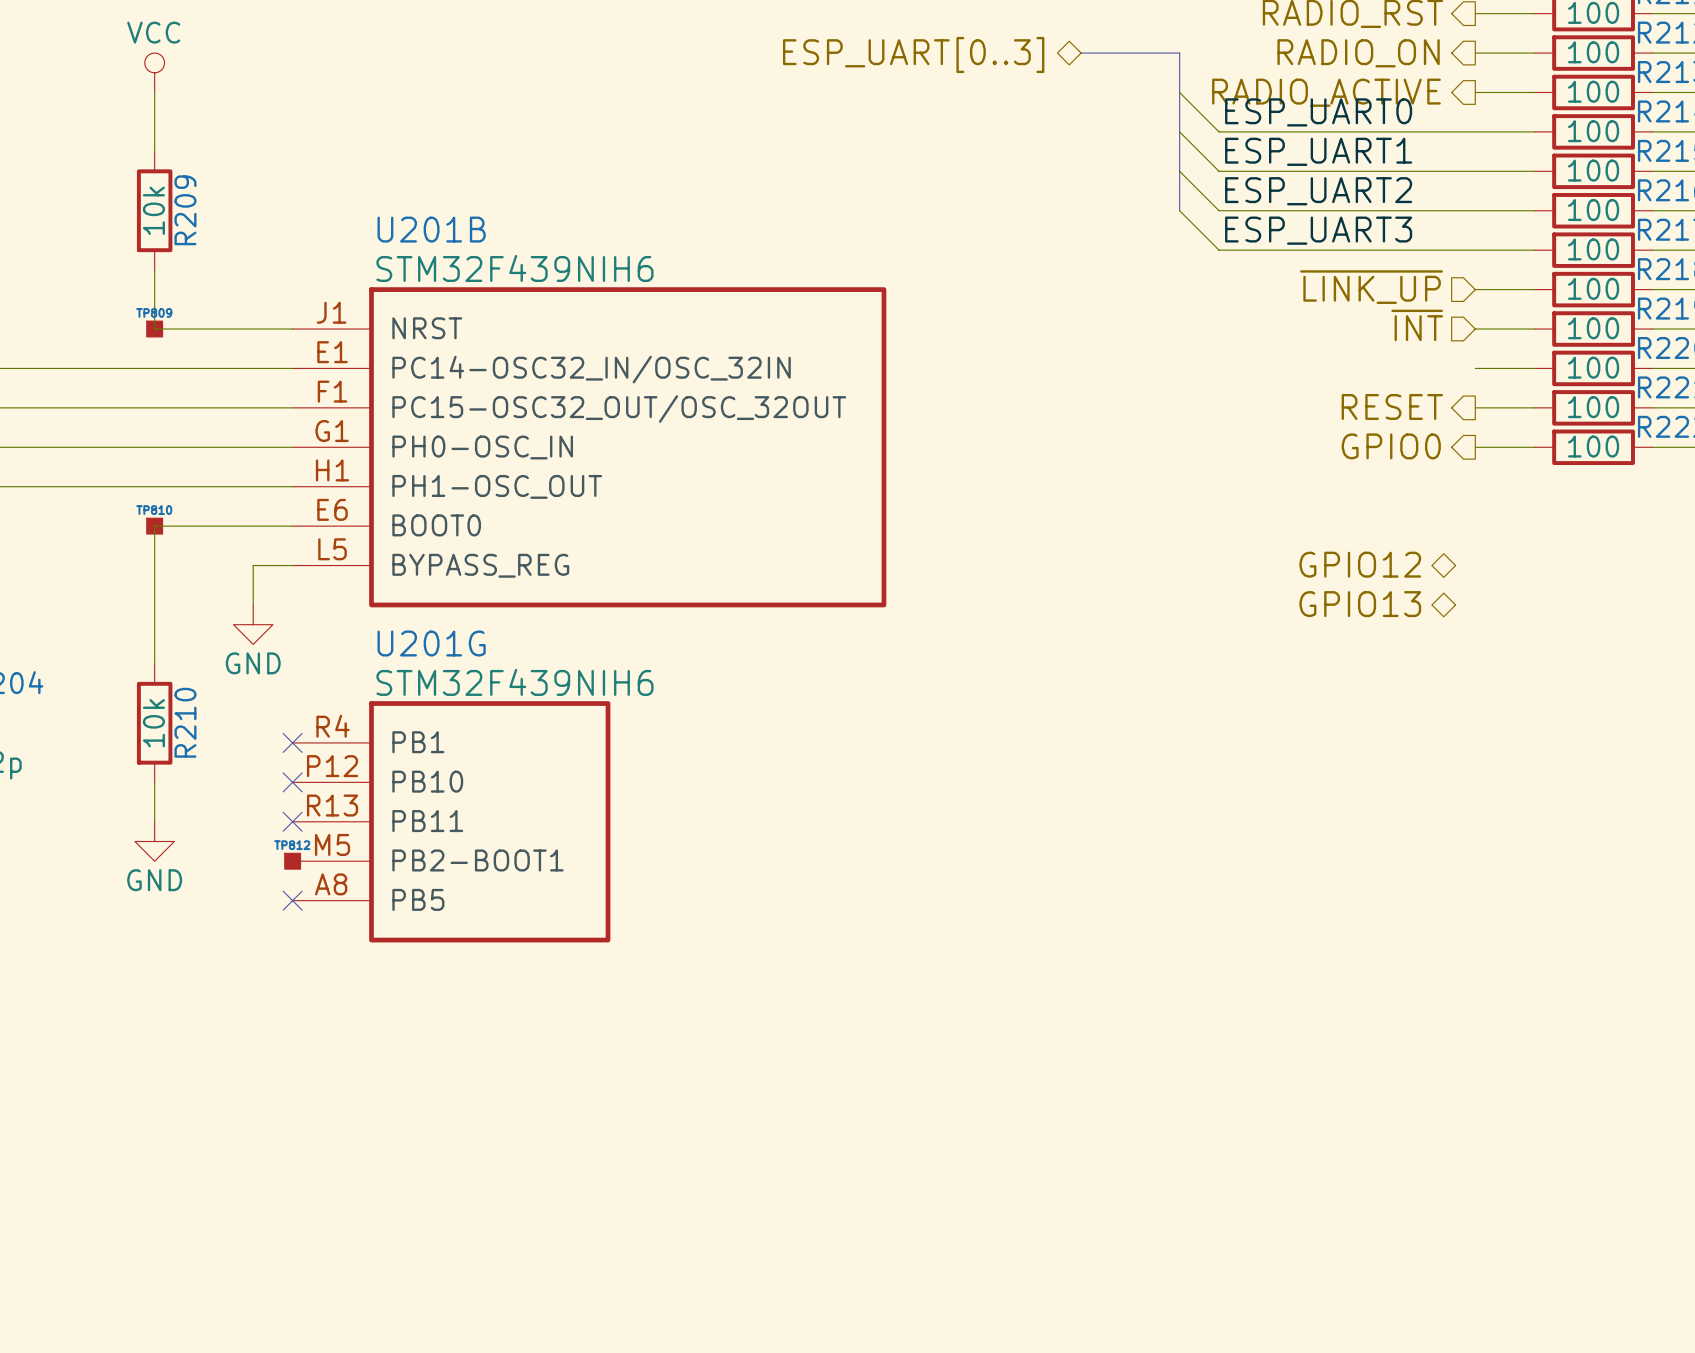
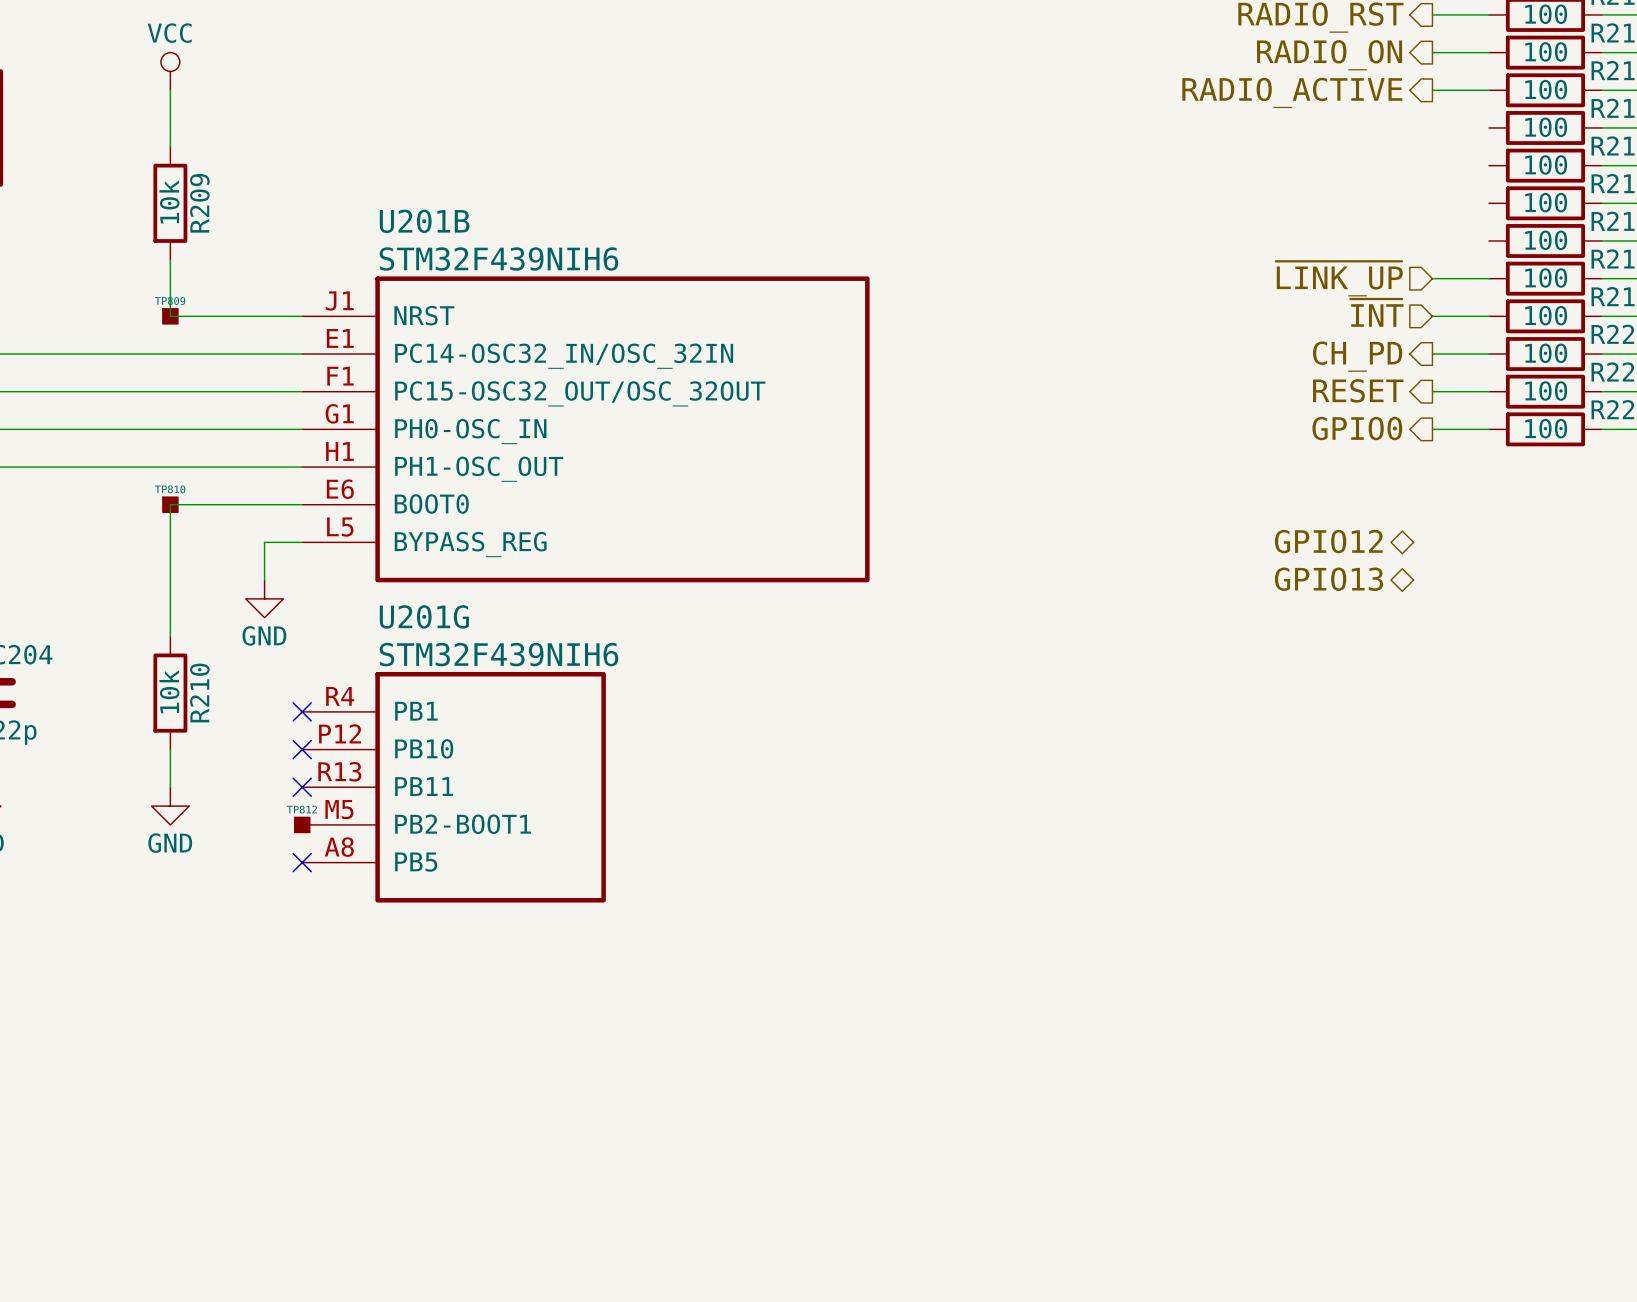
bus: (1081, 53) (1179, 53) (1179, 210) -> none
hierarchical label: ESP_UART[0..3] (913, 54) -> none
wire: (1179, 92) (1219, 131) (1534, 131) -> none
label: ESP_UART0 (1318, 112) -> none
wire: (1179, 131) (1219, 171) (1534, 171) -> none
label: ESP_UART1 (1318, 151) -> none
wire: (1179, 171) (1219, 210) (1534, 210) -> none
label: ESP_UART2 (1318, 191) -> none
wire: (1179, 210) (1219, 250) (1534, 250) -> none
label: ESP_UART3 (1318, 230) -> none
hierarchical label: none -> CH_PD (1357, 356)

